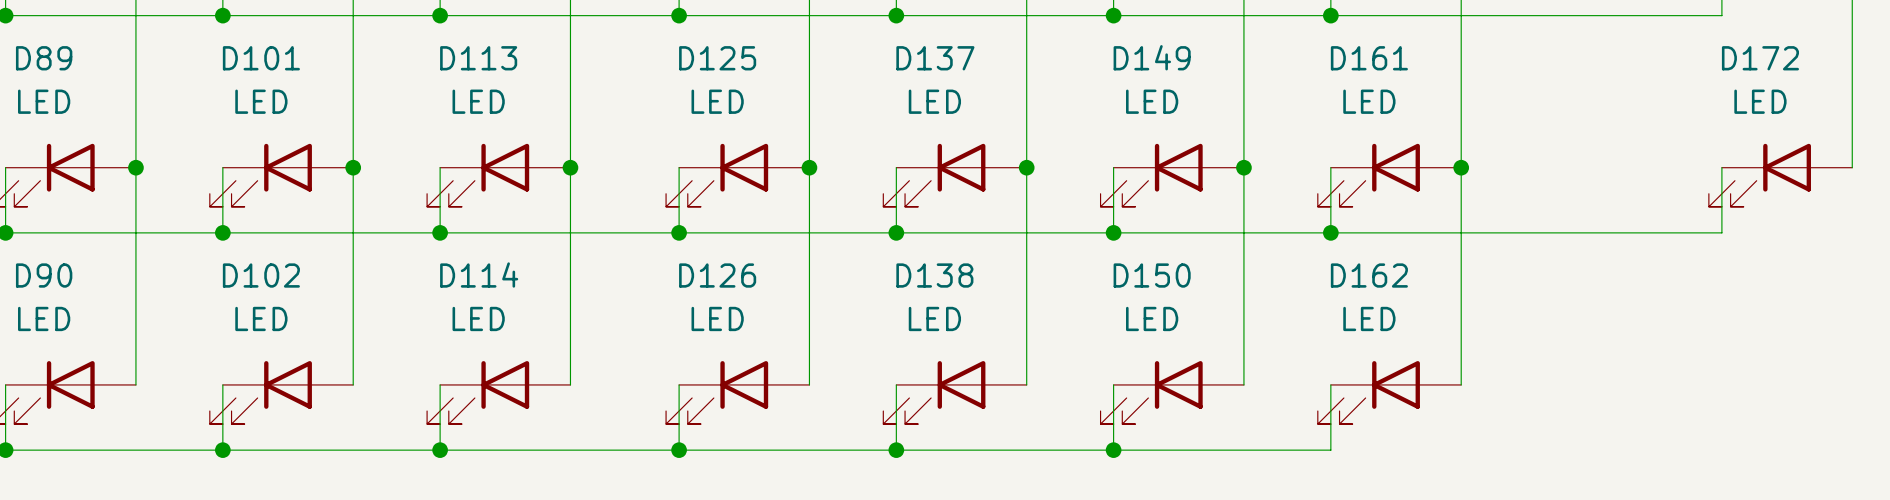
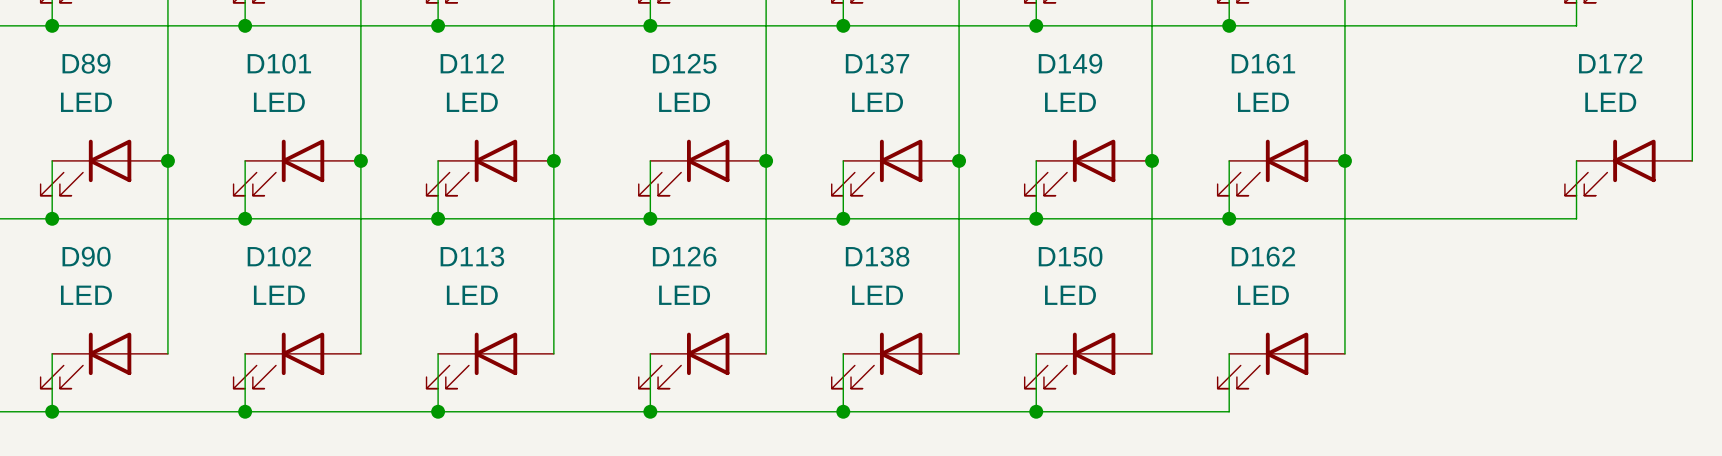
D113 name: D113 (478, 58) -> D112 (472, 63)
D114 name: D114 (479, 275) -> D113 (472, 256)

